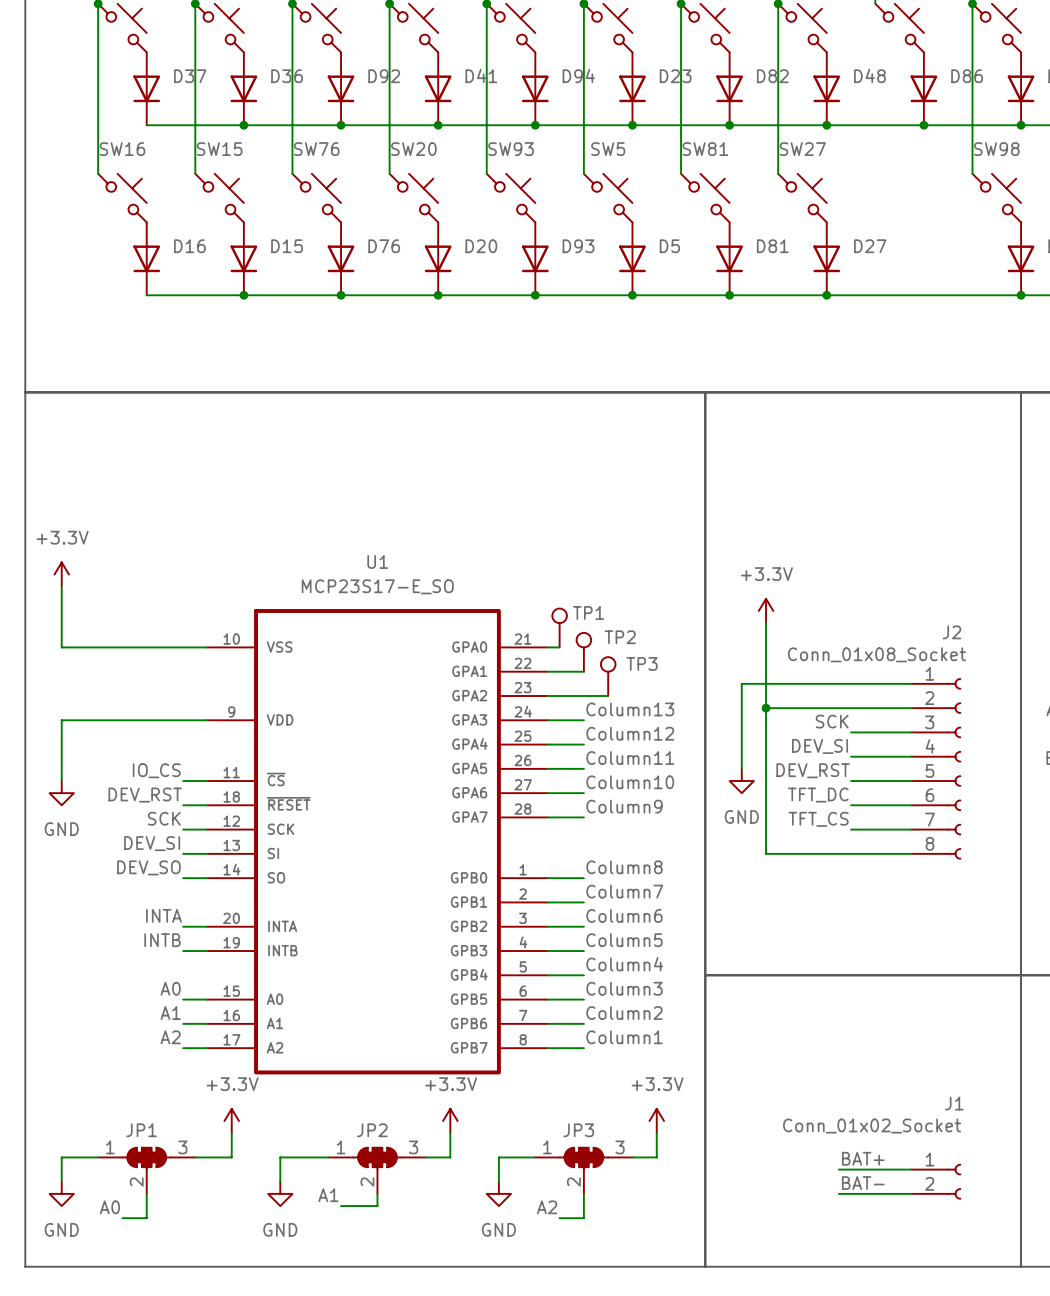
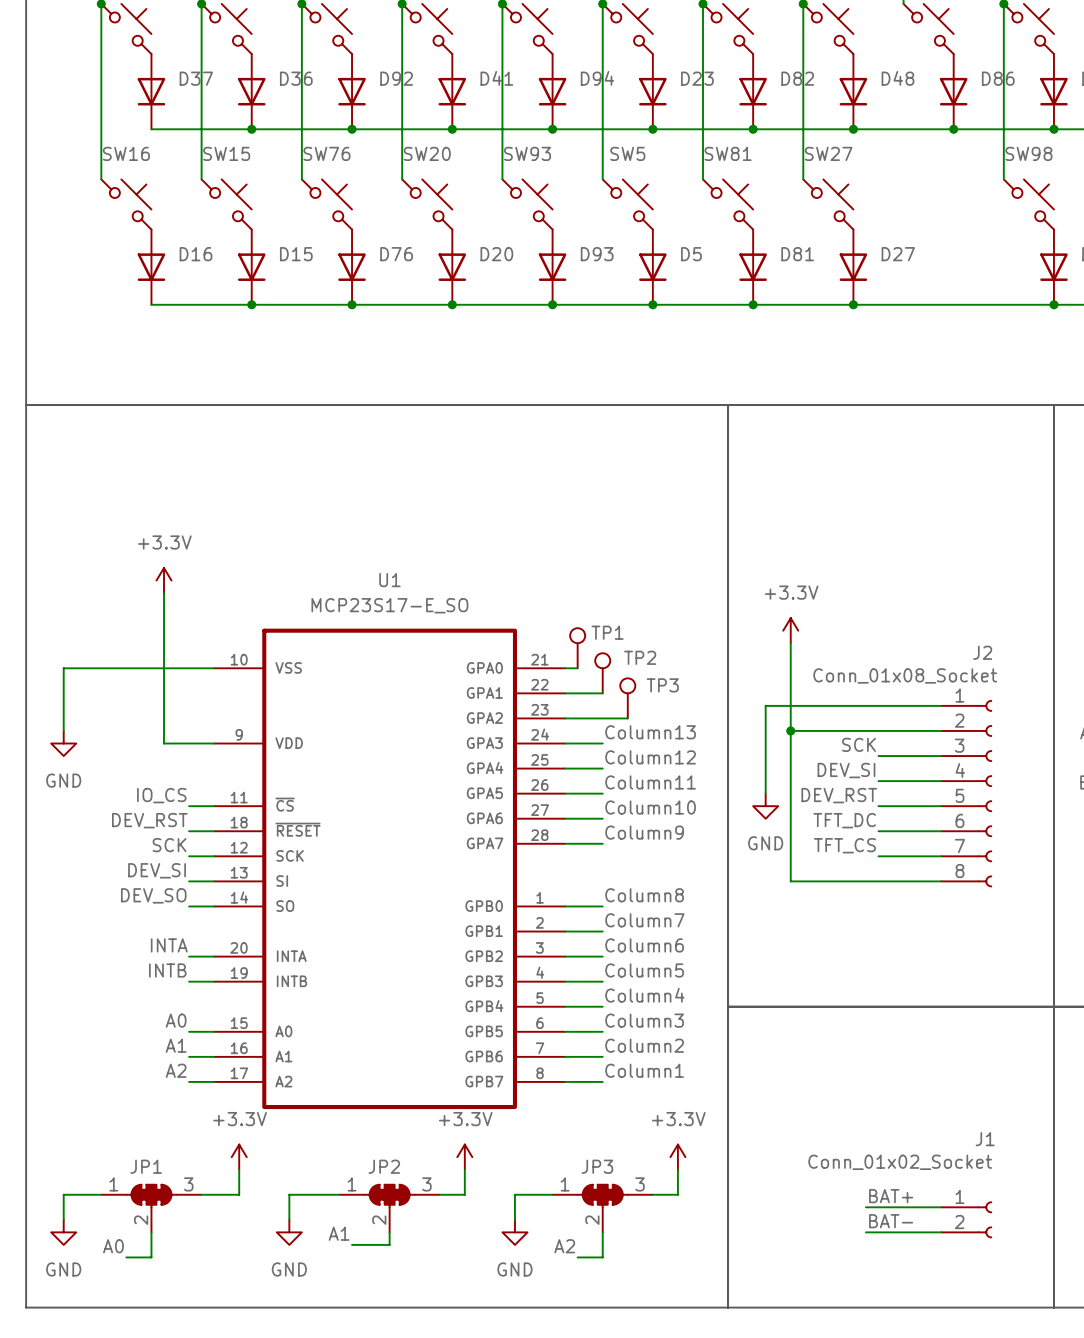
power symbol position: +3.3V (61, 574) -> +3.3V (163, 580)
wire: (61, 586) (61, 647) -> (63, 730) (63, 668)
wire: (158, 720) (61, 720) (61, 781) -> (163, 743) (163, 593)
power symbol position: GND (61, 793) -> GND (63, 743)

